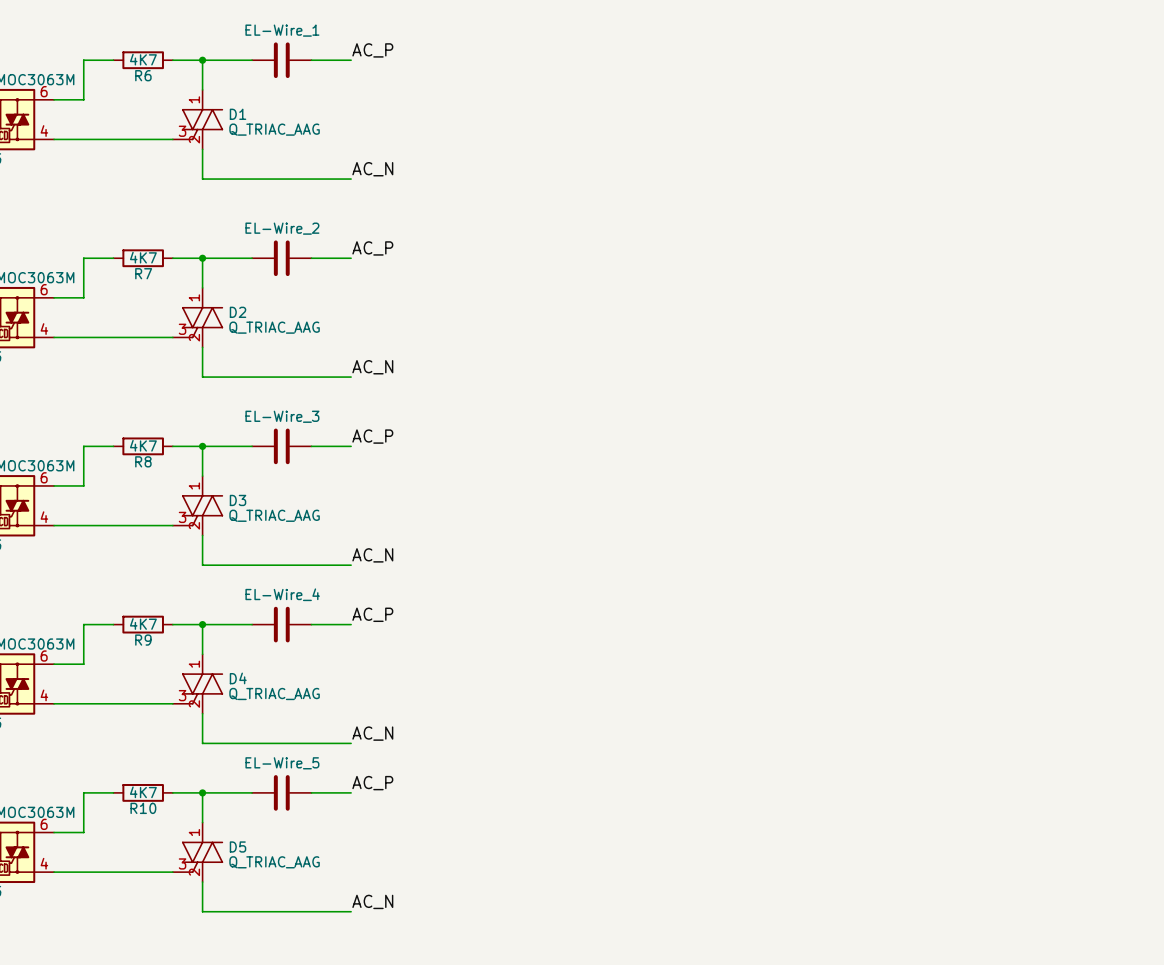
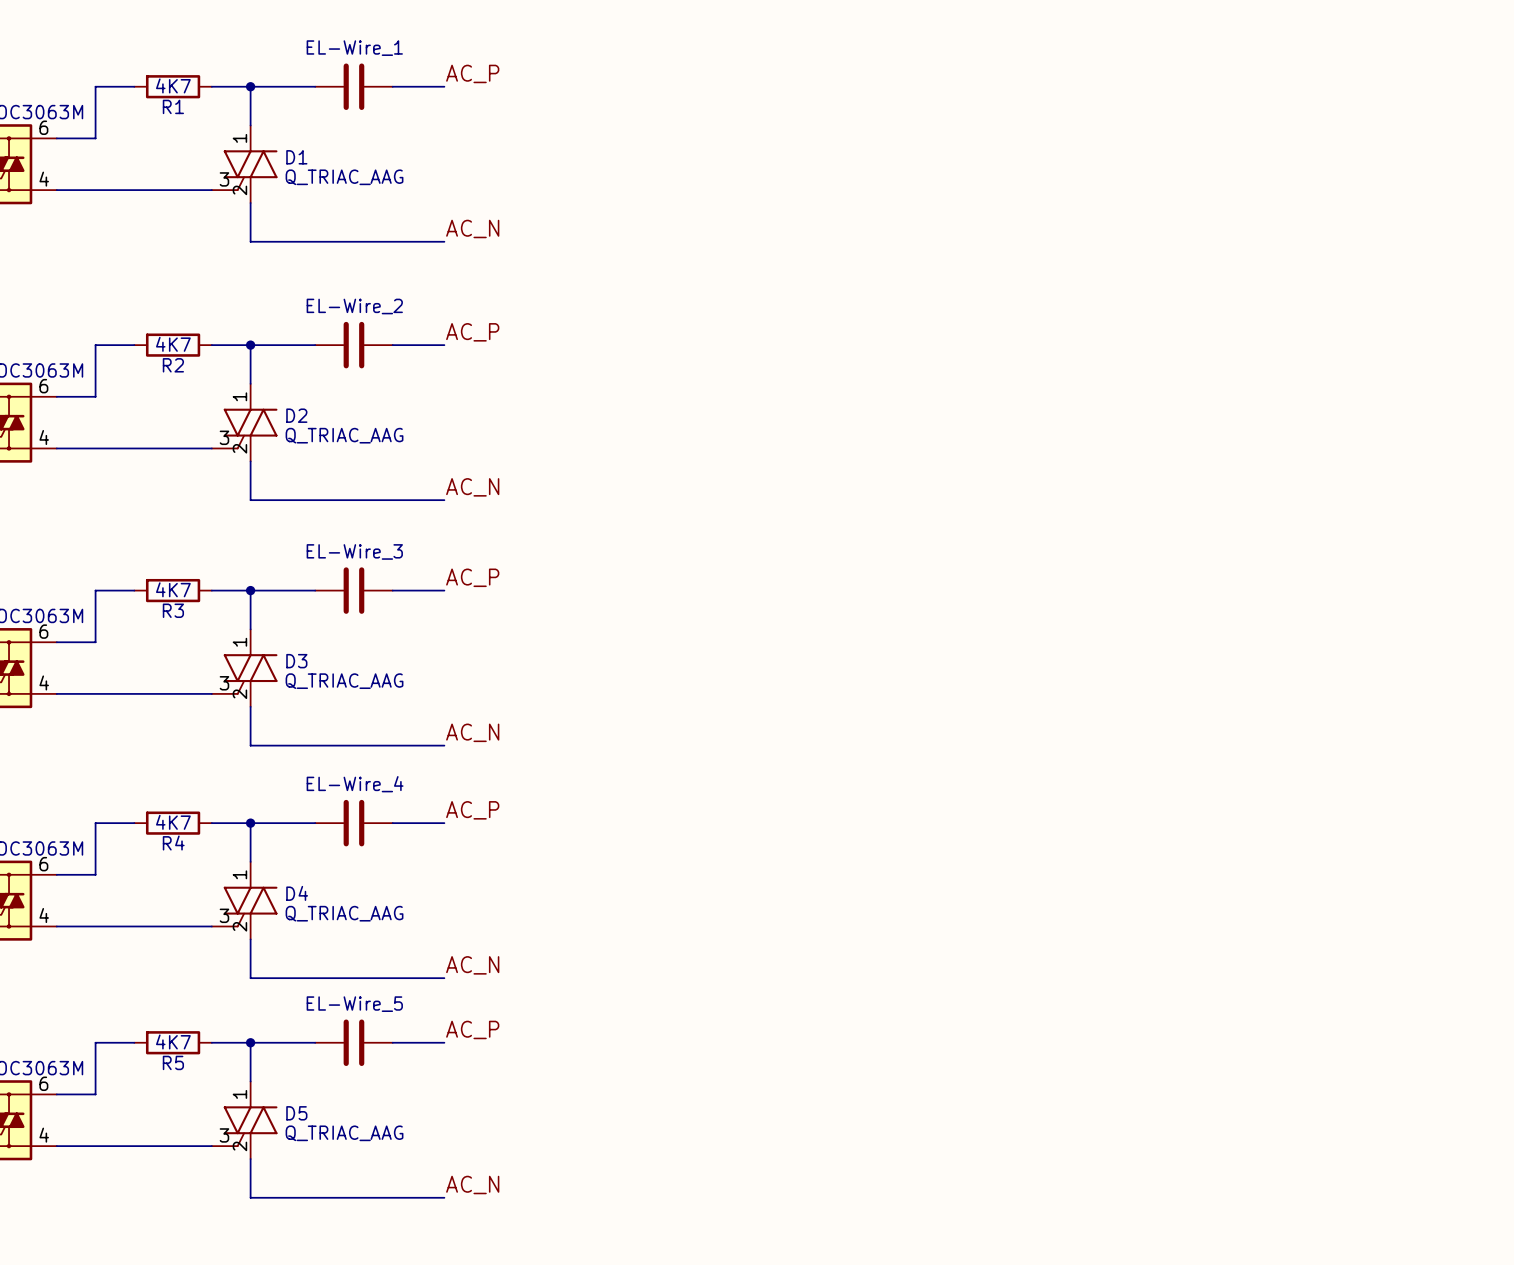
R6 name: R6 (143, 75) -> R1 (173, 106)
R7 name: R7 (143, 273) -> R2 (173, 365)
R8 name: R8 (143, 461) -> R3 (173, 610)
R9 name: R9 (143, 640) -> R4 (173, 843)
R10 name: R10 (143, 808) -> R5 (173, 1062)

